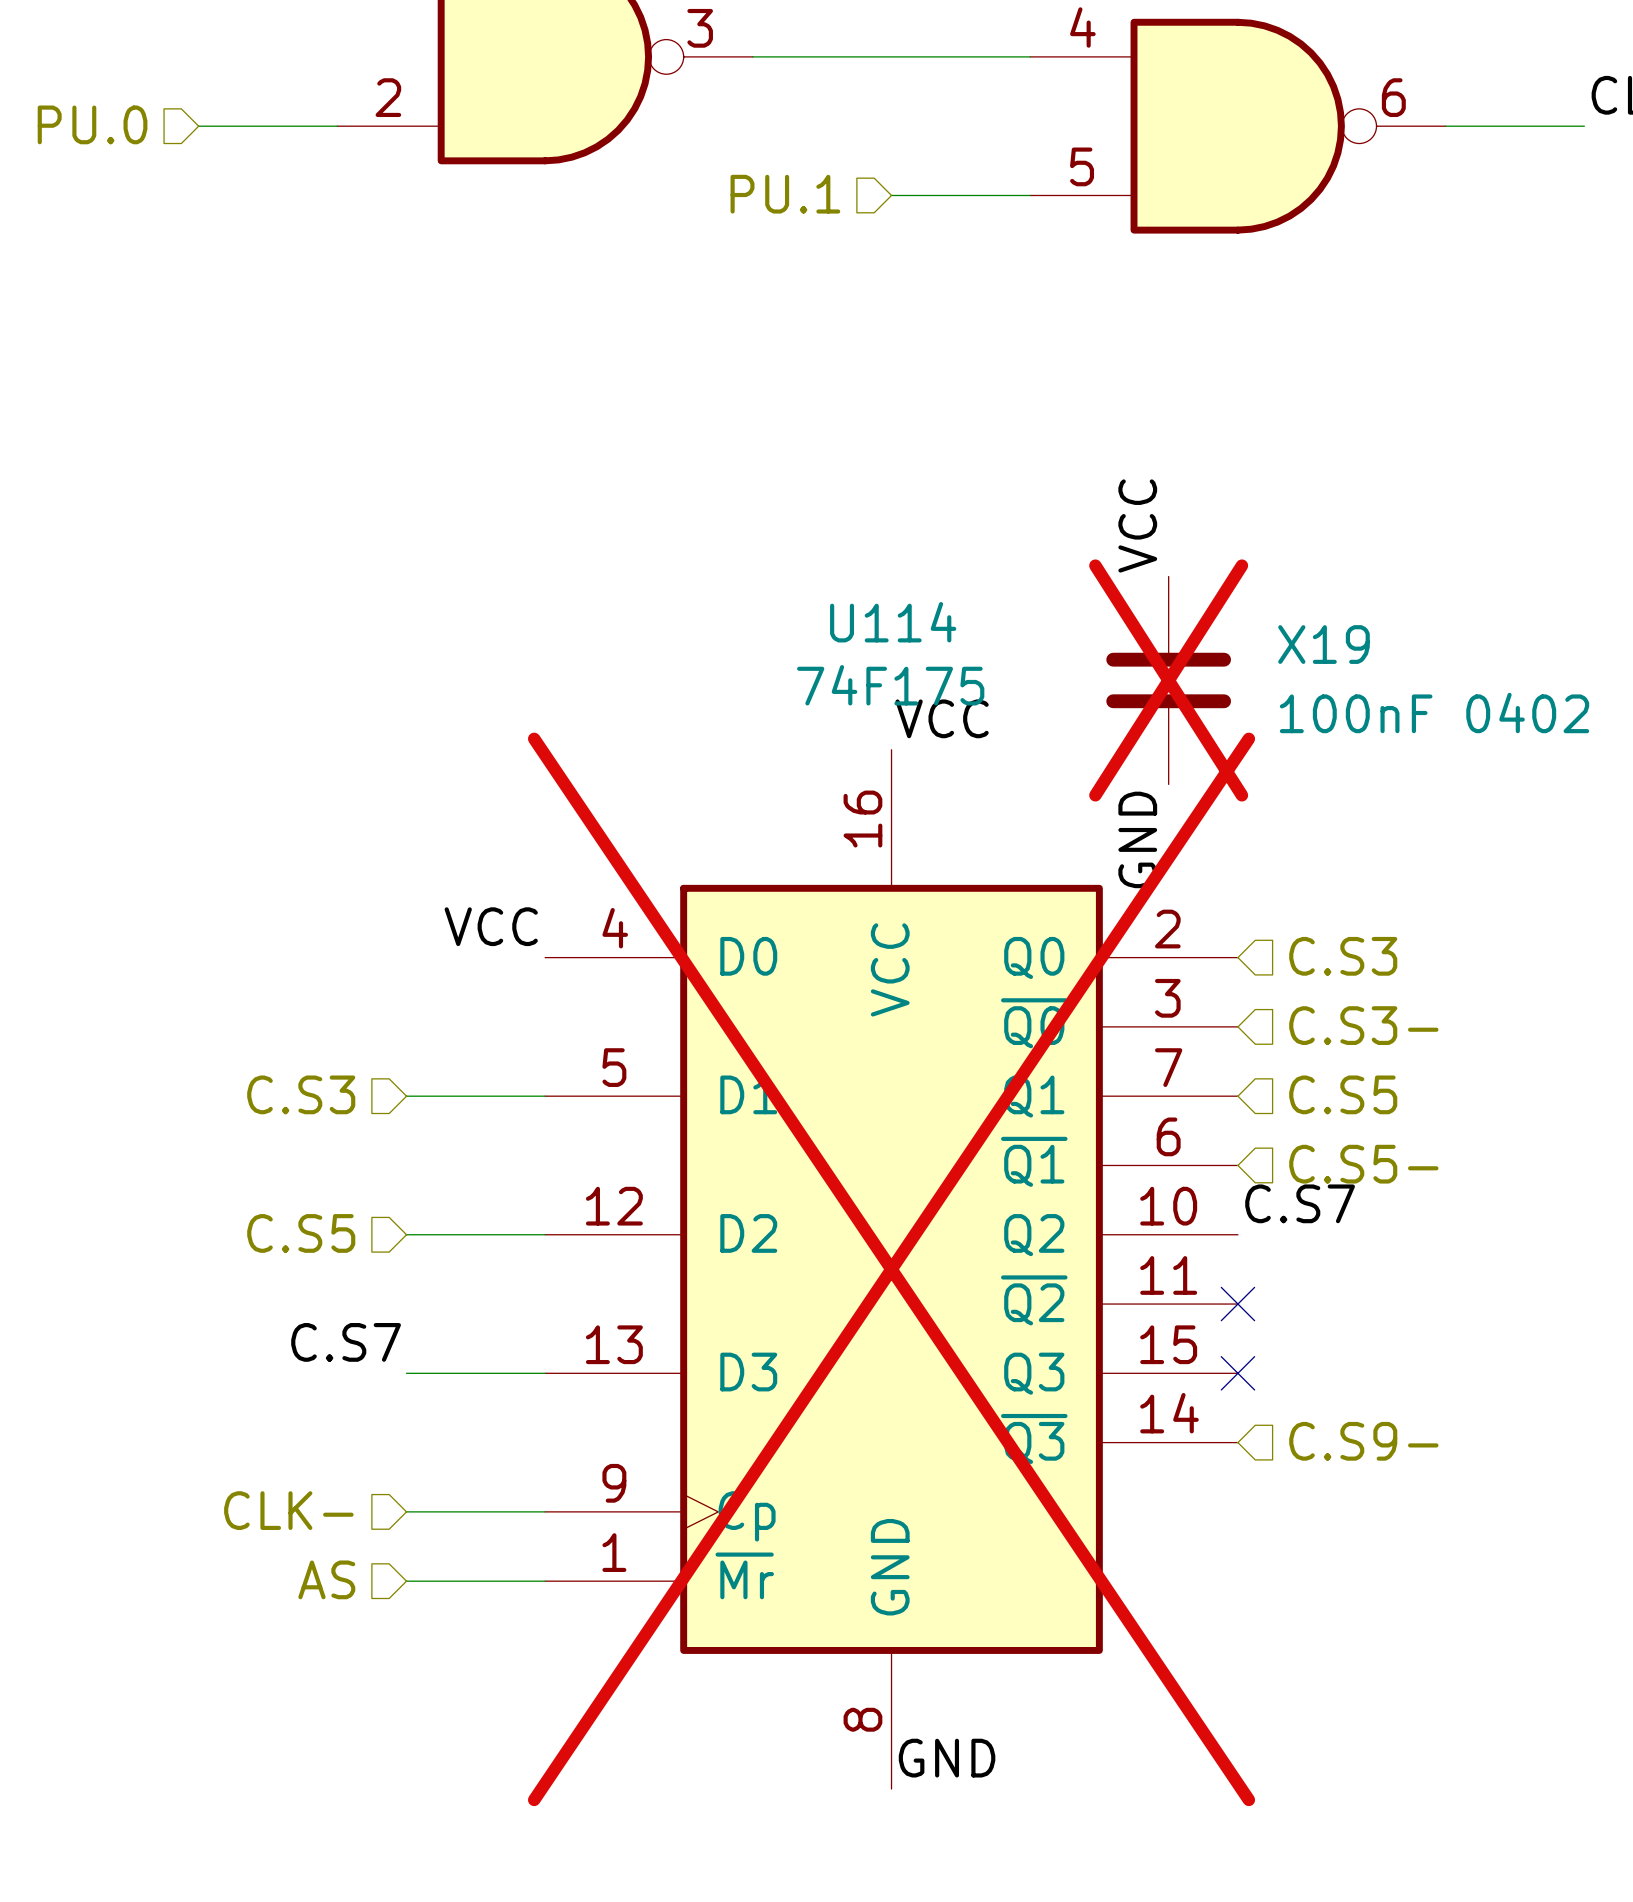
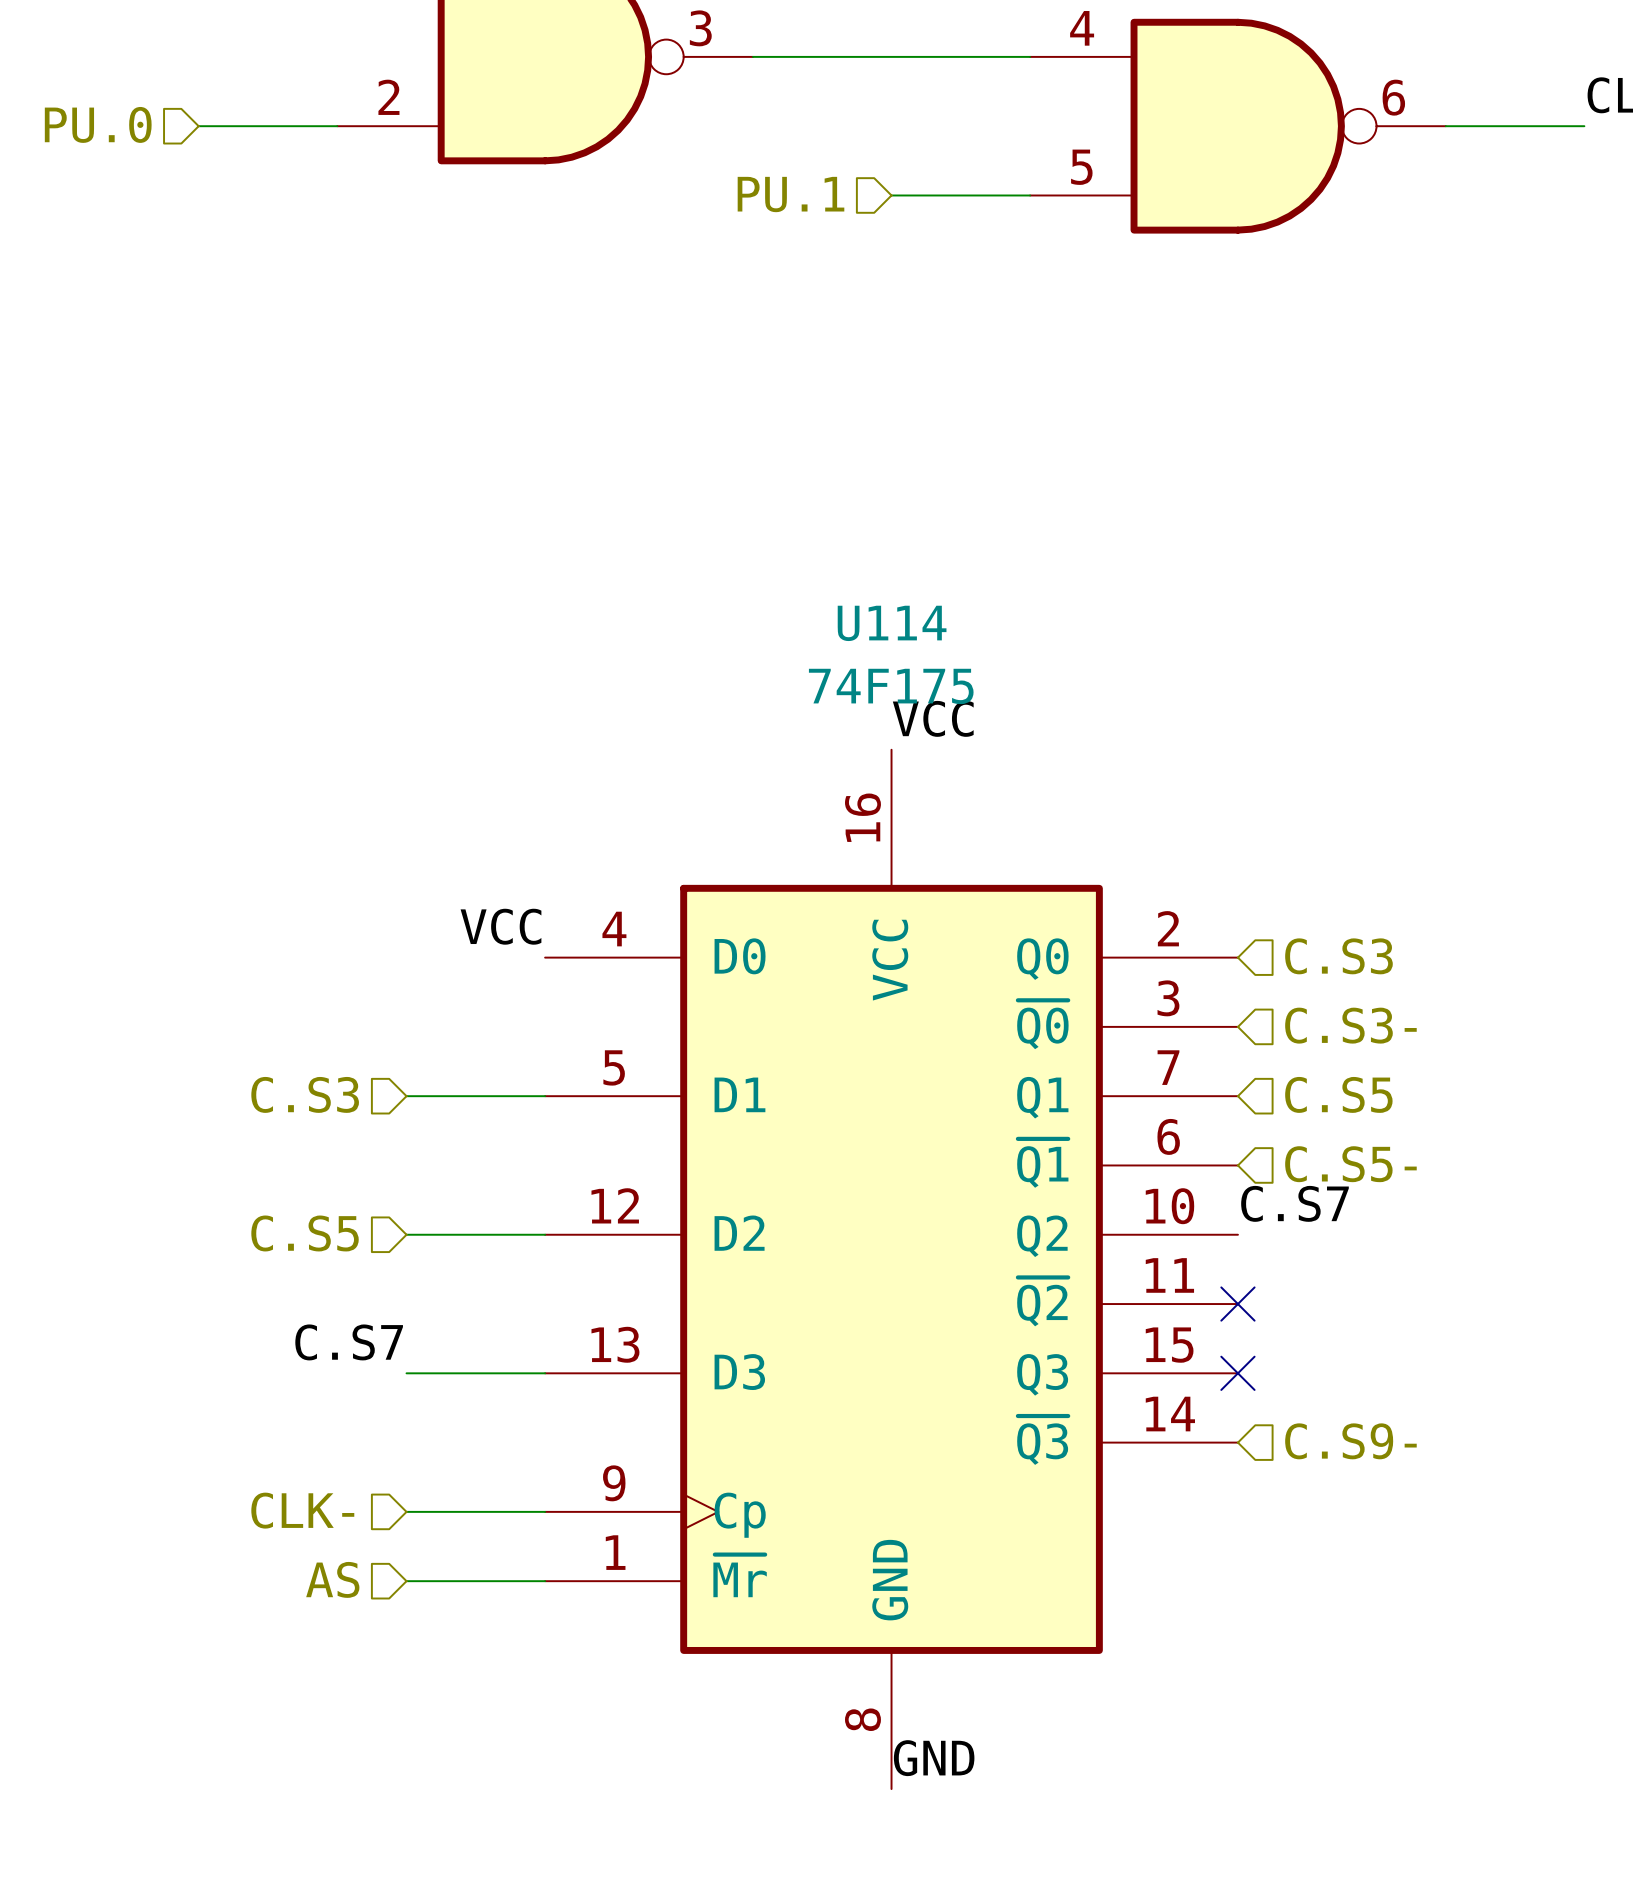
label: VCC (1137, 525) -> none
X19: 100nF 0402 (1168, 680) -> none
label: GND (1137, 839) -> none
U114 do-not-place cross: (891, 1269) -> none

